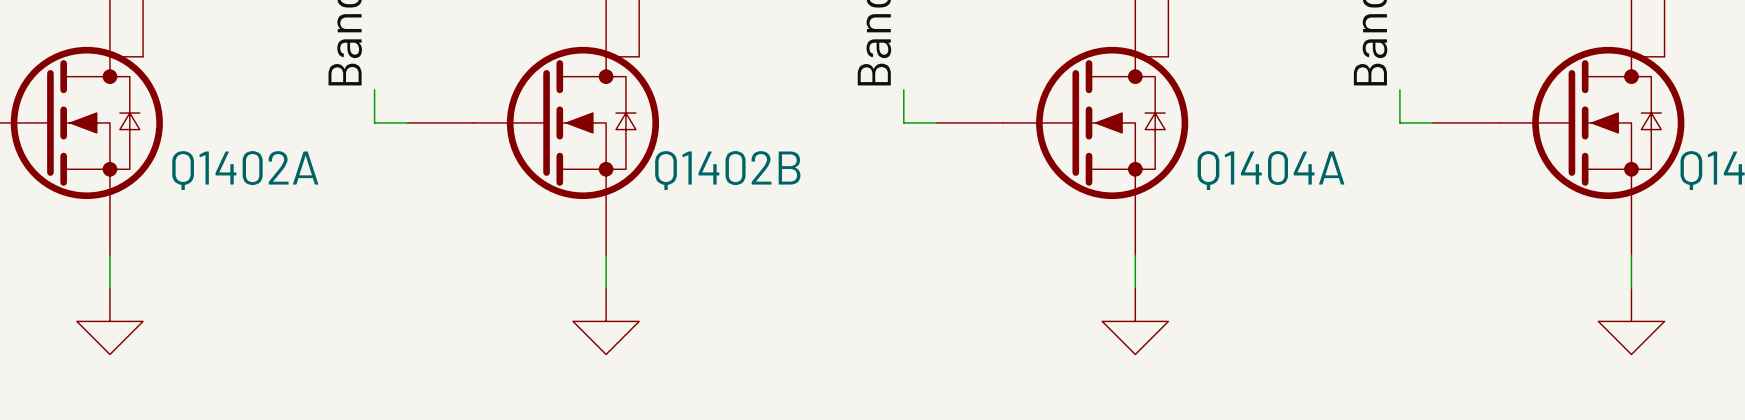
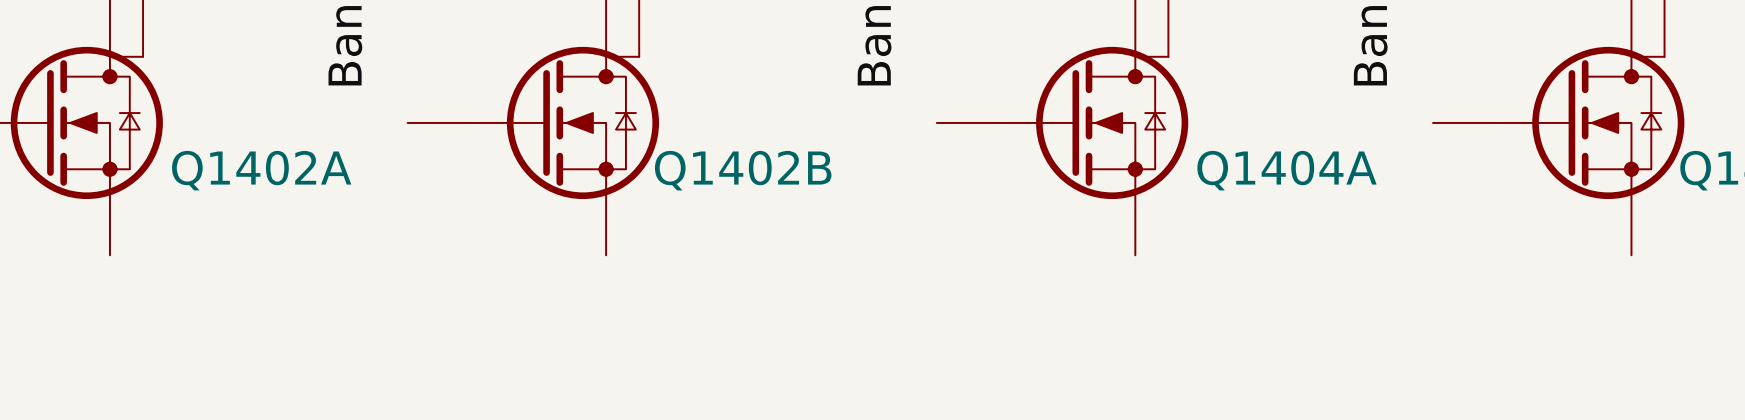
wire: (374, 89) (374, 122) (407, 122) -> none
wire: (903, 89) (903, 122) (936, 122) -> none
wire: (1399, 89) (1399, 122) (1433, 122) -> none
wire: (109, 255) (109, 288) -> none
wire: (606, 255) (606, 288) -> none
wire: (1135, 255) (1135, 288) -> none
wire: (1631, 255) (1631, 288) -> none
power symbol: (109, 321) -> none
power symbol: (606, 321) -> none
power symbol: (1135, 321) -> none
power symbol: (1631, 321) -> none

